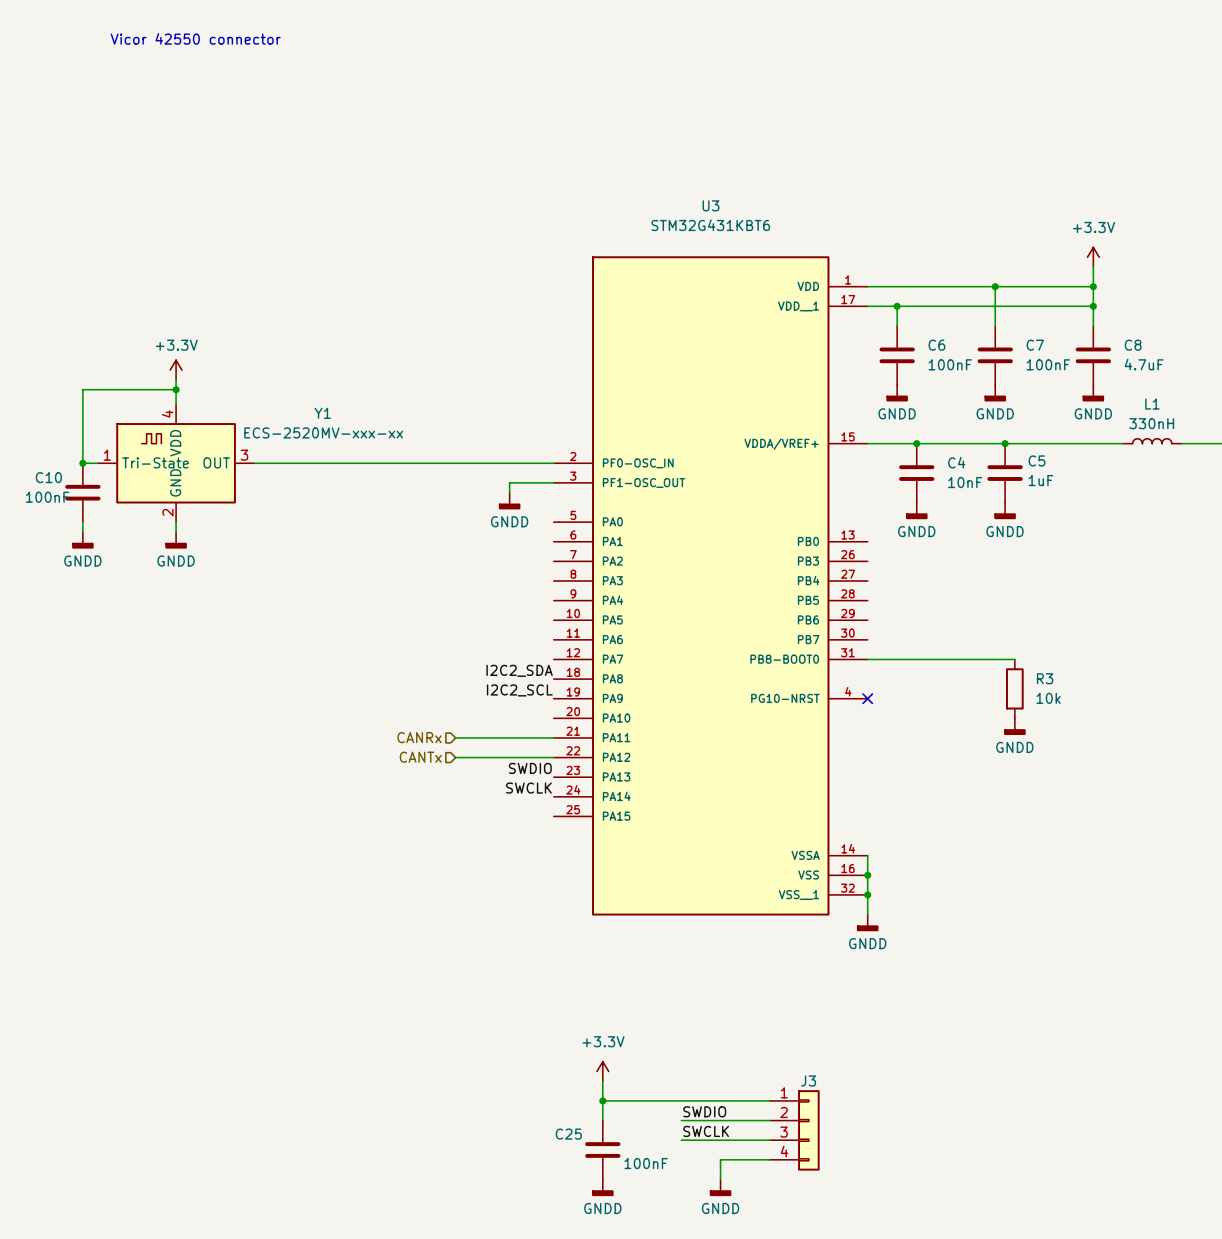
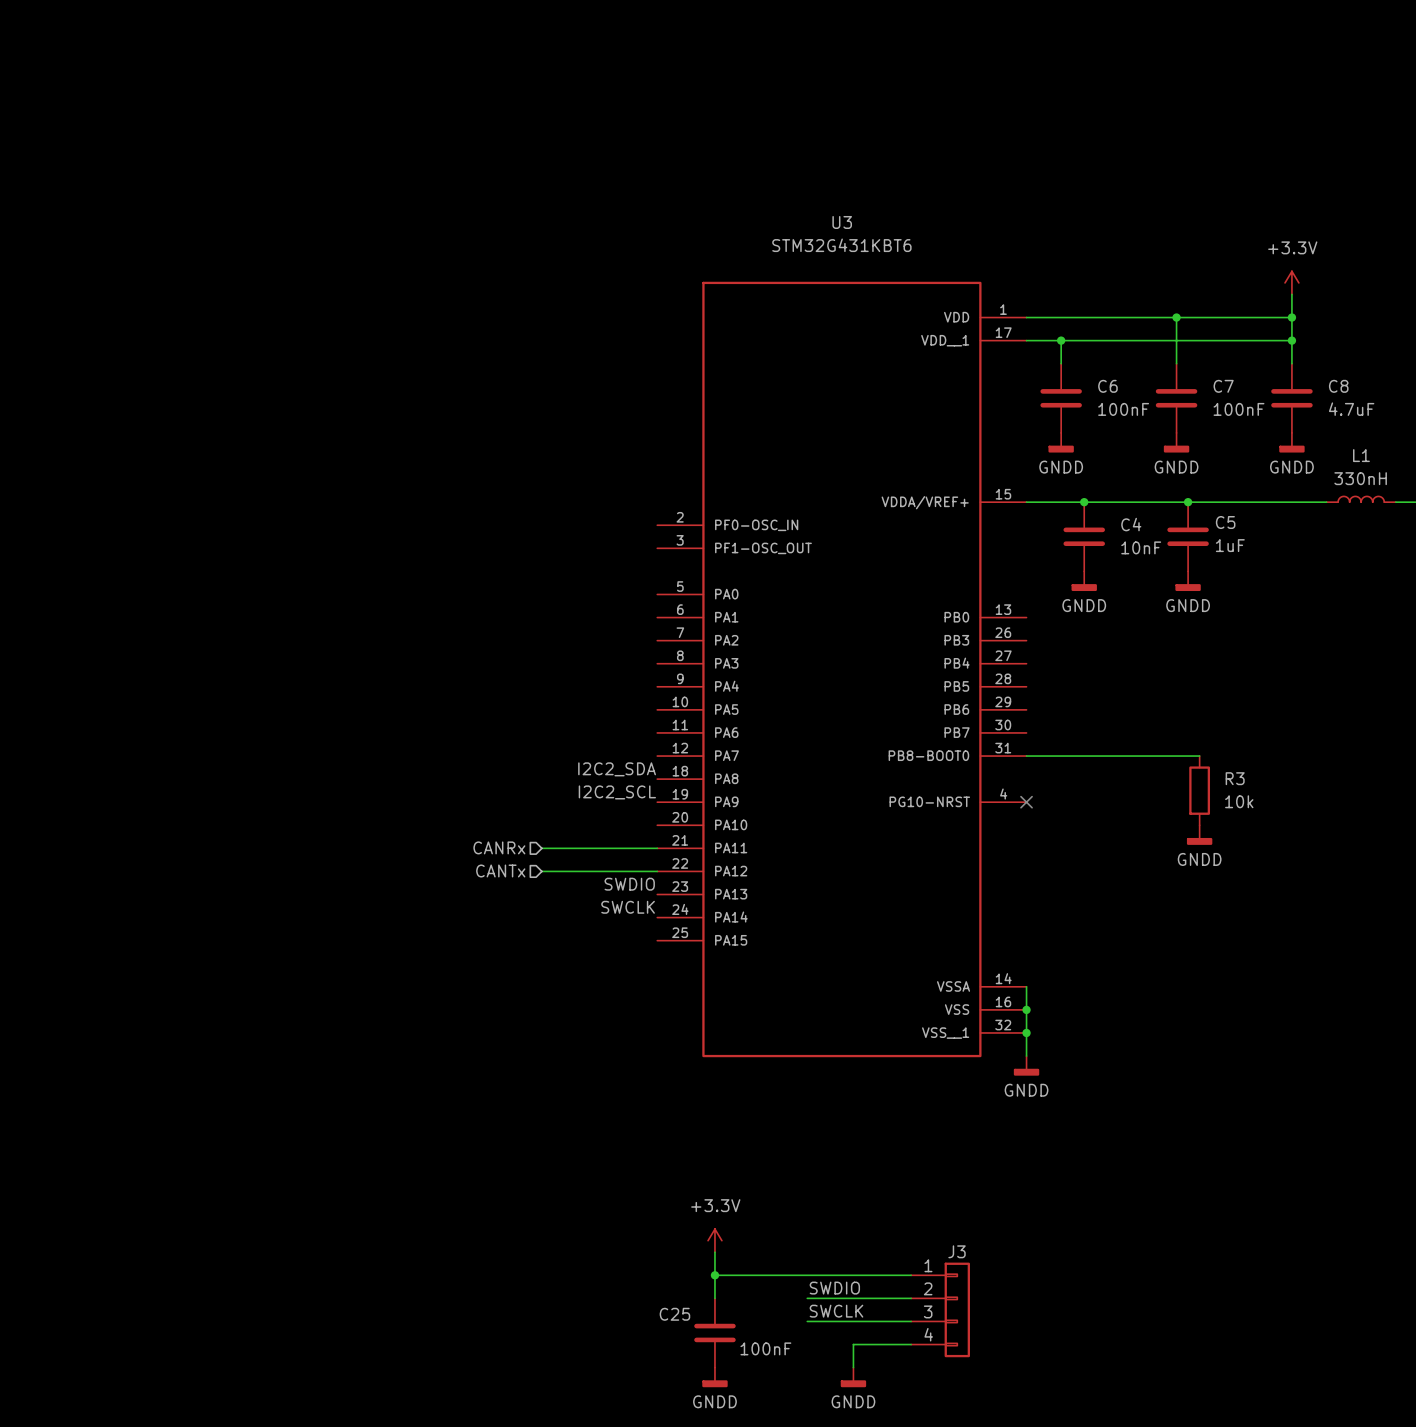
text: Vicor 42550 connector (195, 38) -> none
power symbol: +3.3V (176, 370) -> none
wire: (176, 379) (176, 404) -> none
wire: (176, 389) (82, 389) (82, 463) (97, 463) -> none
junction: (176, 389) -> none
junction: (82, 463) -> none
Y1: ECS-2520MV-xxx-xx (176, 463) -> none
wire: (254, 463) (553, 463) -> none
wire: (553, 482) (509, 482) (509, 492) -> none
C10: 100nF (82, 492) -> none
power symbol: GNDD (509, 501) -> none
wire: (82, 522) (82, 531) -> none
wire: (176, 522) (176, 531) -> none
power symbol: GNDD (82, 540) -> none
power symbol: GNDD (176, 540) -> none

